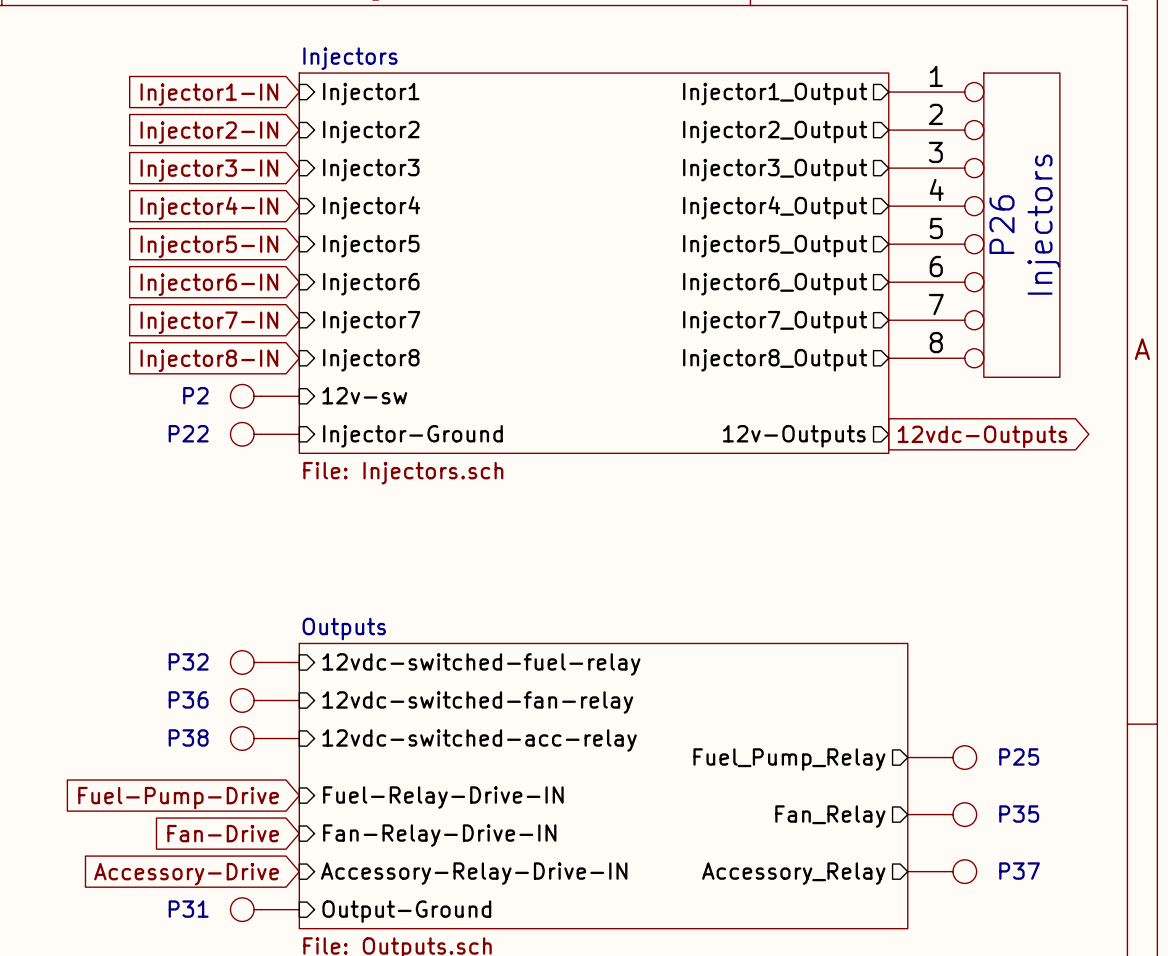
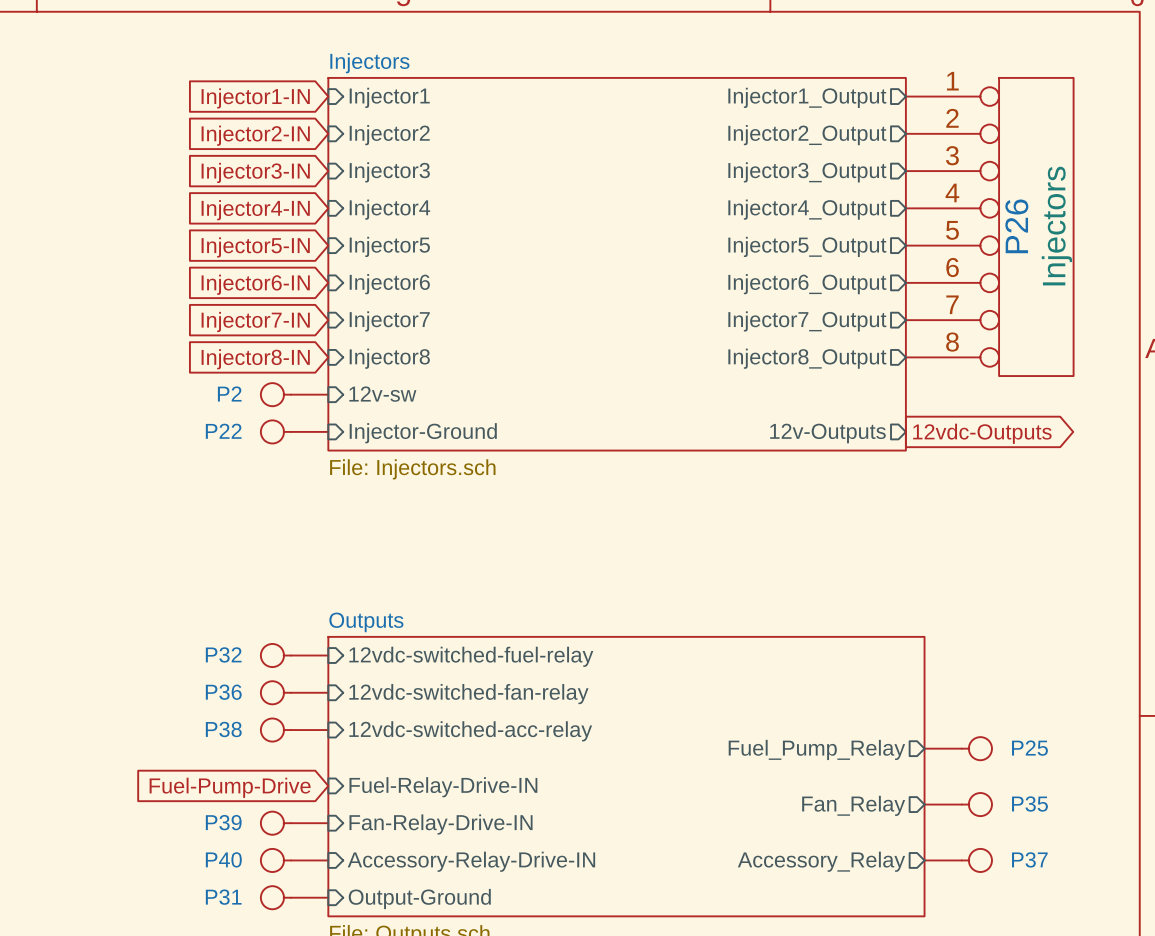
global label: Fan-Drive (223, 833) -> none
P39: none -> (294, 823)
P40: none -> (294, 860)
global label: Accessory-Drive (186, 874) -> none

